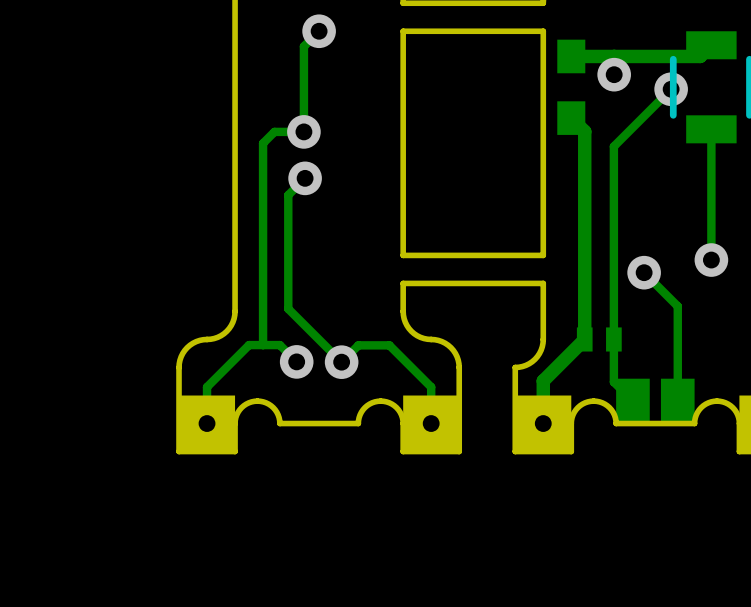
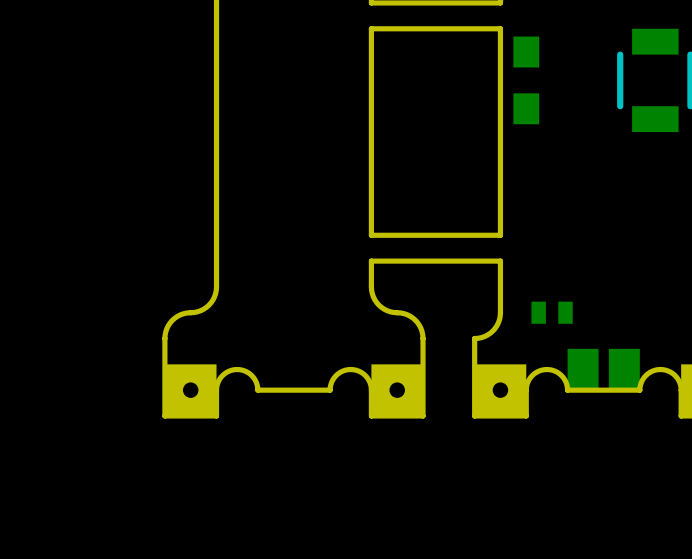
track: (319, 31) (303, 46) (303, 131) (274, 131) (263, 143) (263, 345) -> none
via: (319, 31) -> none
track: (711, 45) (700, 56) (571, 56) -> none
via: (614, 74) -> none
track: (671, 89) (613, 146) (613, 382) (632, 401) -> none
via: (671, 89) -> none
track: (571, 118) (584, 131) (584, 339) (543, 380) (543, 423) -> none
track: (711, 129) (711, 260) -> none
via: (303, 131) -> none
track: (305, 178) (288, 195) (288, 308) (341, 362) (358, 345) (389, 345) (431, 387) (431, 423) -> none
via: (305, 178) -> none
via: (711, 260) -> none
track: (644, 272) (677, 306) (677, 401) -> none
via: (644, 272) -> none
track: (296, 361) (279, 345) (249, 345) (207, 387) (207, 423) -> none
via: (296, 361) -> none
via: (341, 362) -> none

